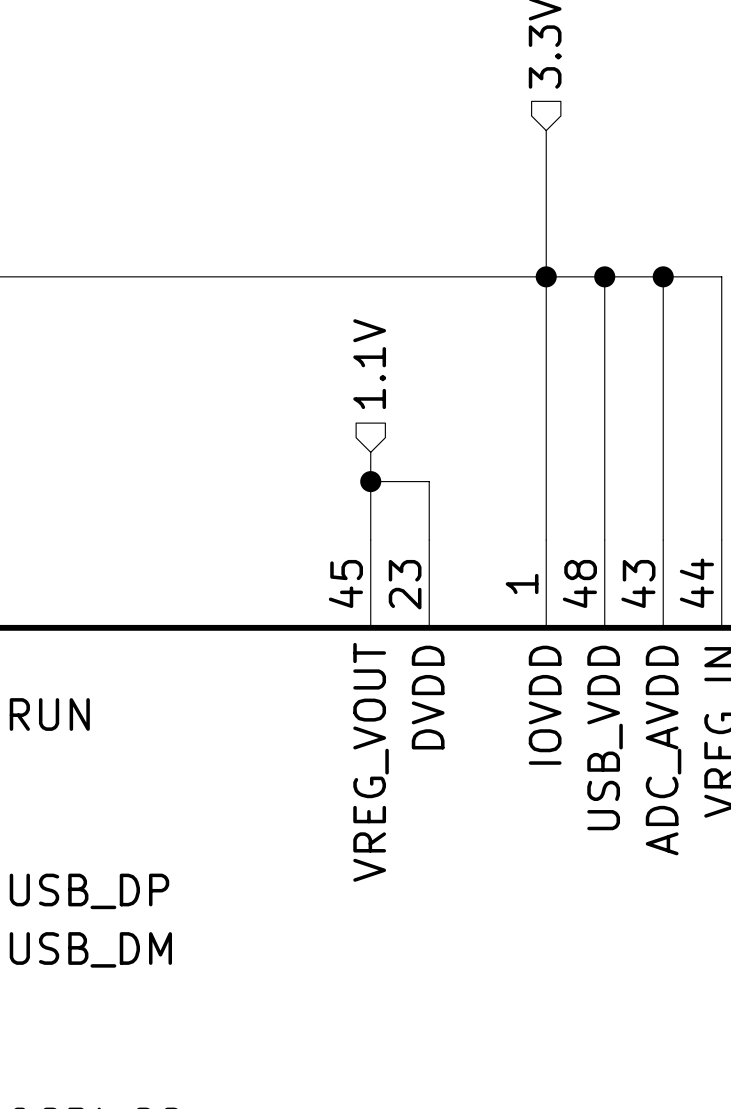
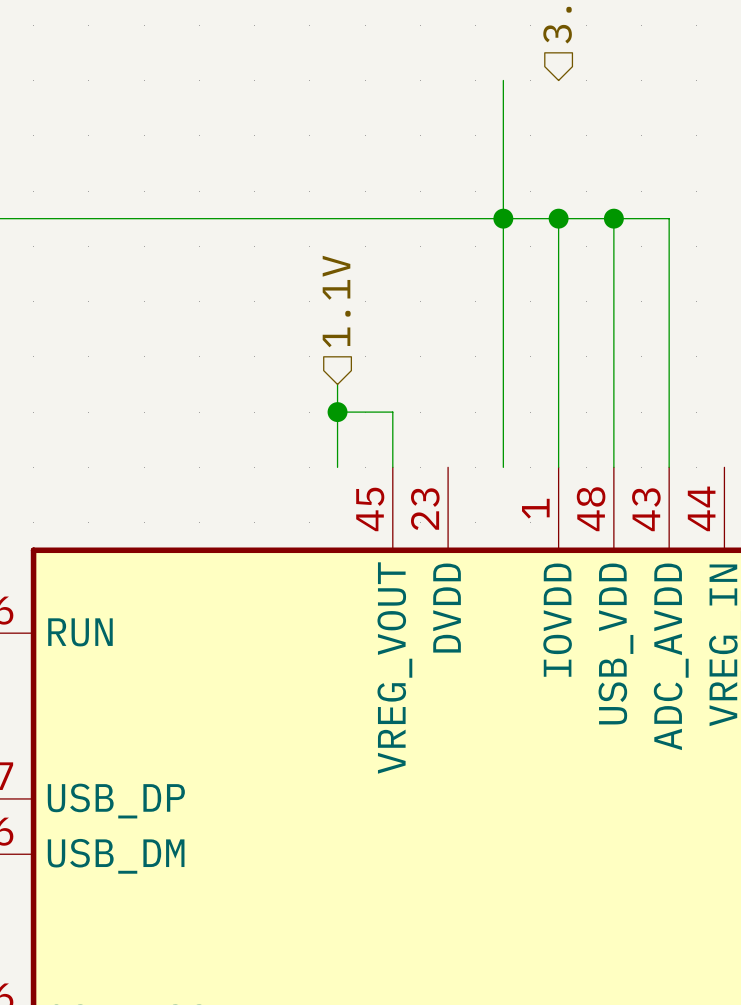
wire: none -> (503, 80) (503, 467)
wire: (546, 130) (546, 276) -> none
junction: none -> (503, 218)
wire: (663, 276) (721, 276) (721, 540) -> none
junction: (663, 276) -> none
hierarchical label position: 1.1V (369, 364) -> 1.1V (336, 301)
wire: none -> (337, 384) (337, 467)
wire: (370, 452) (370, 481) (429, 481) (429, 540) -> none
wire: none -> (337, 412) (392, 412)
junction position: (370, 481) -> (337, 412)

